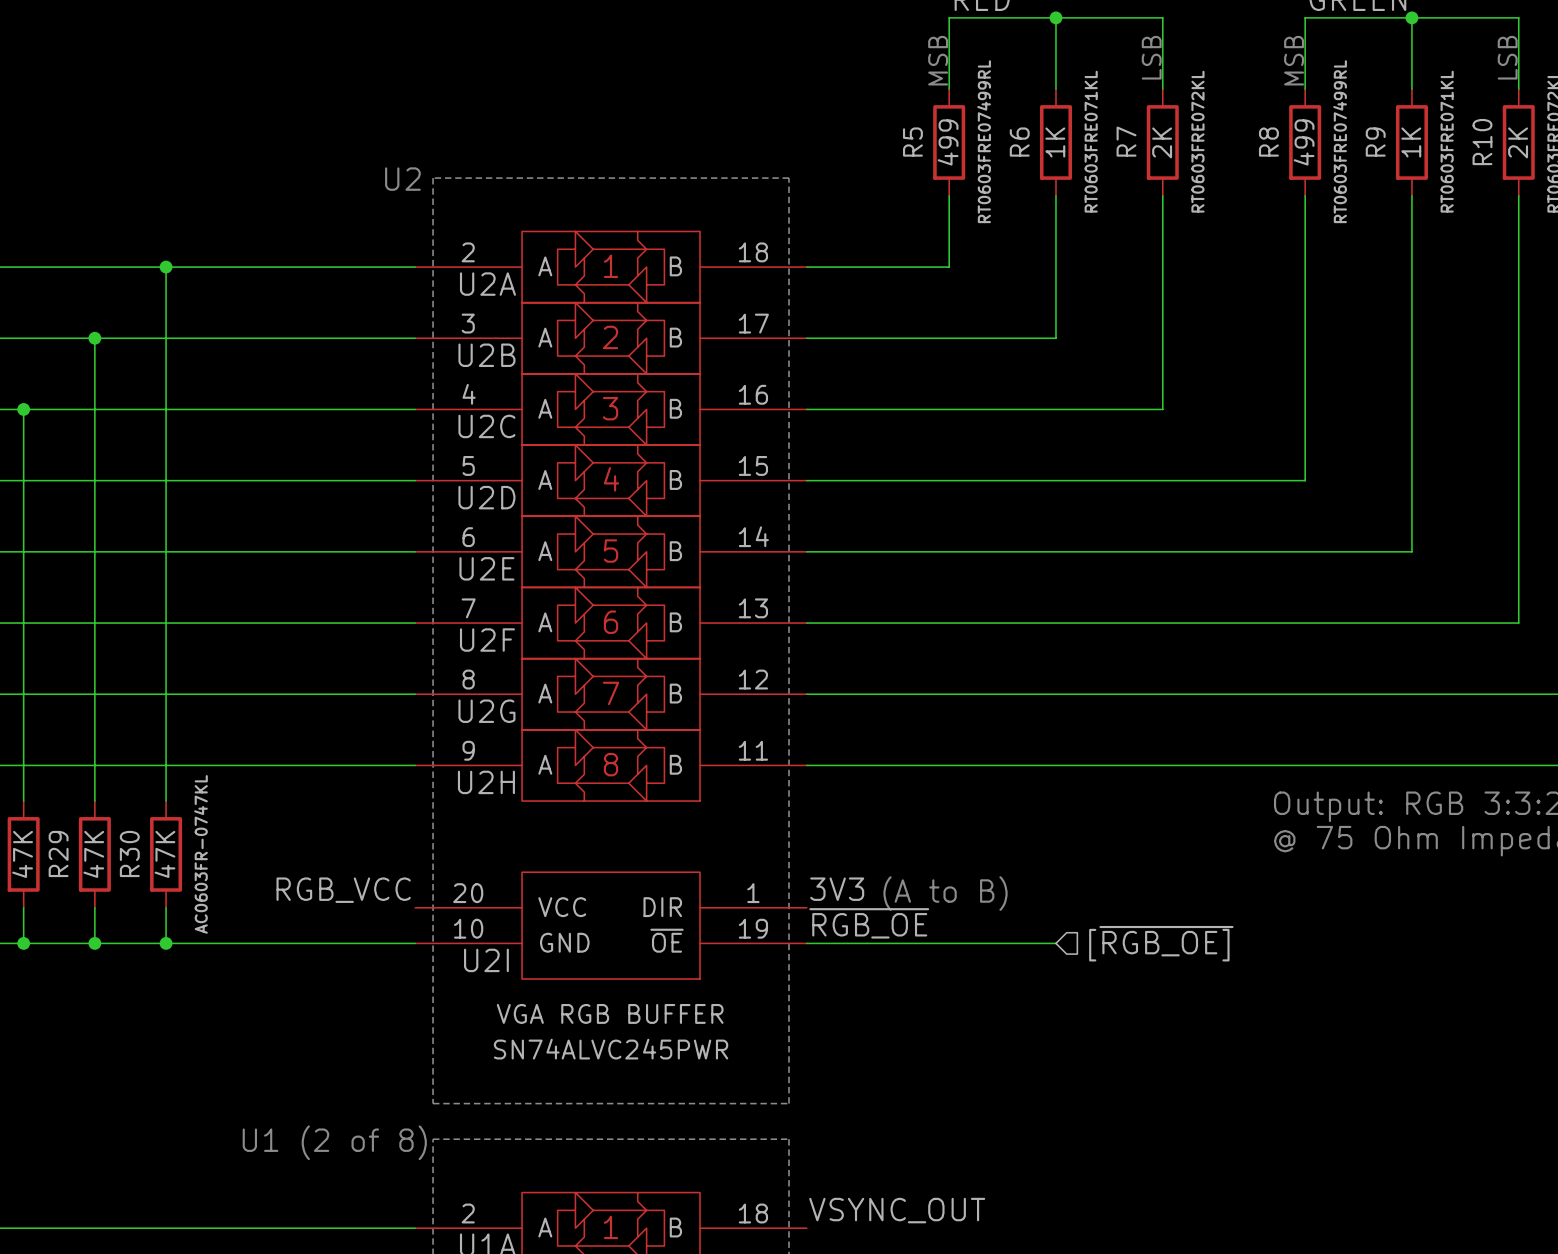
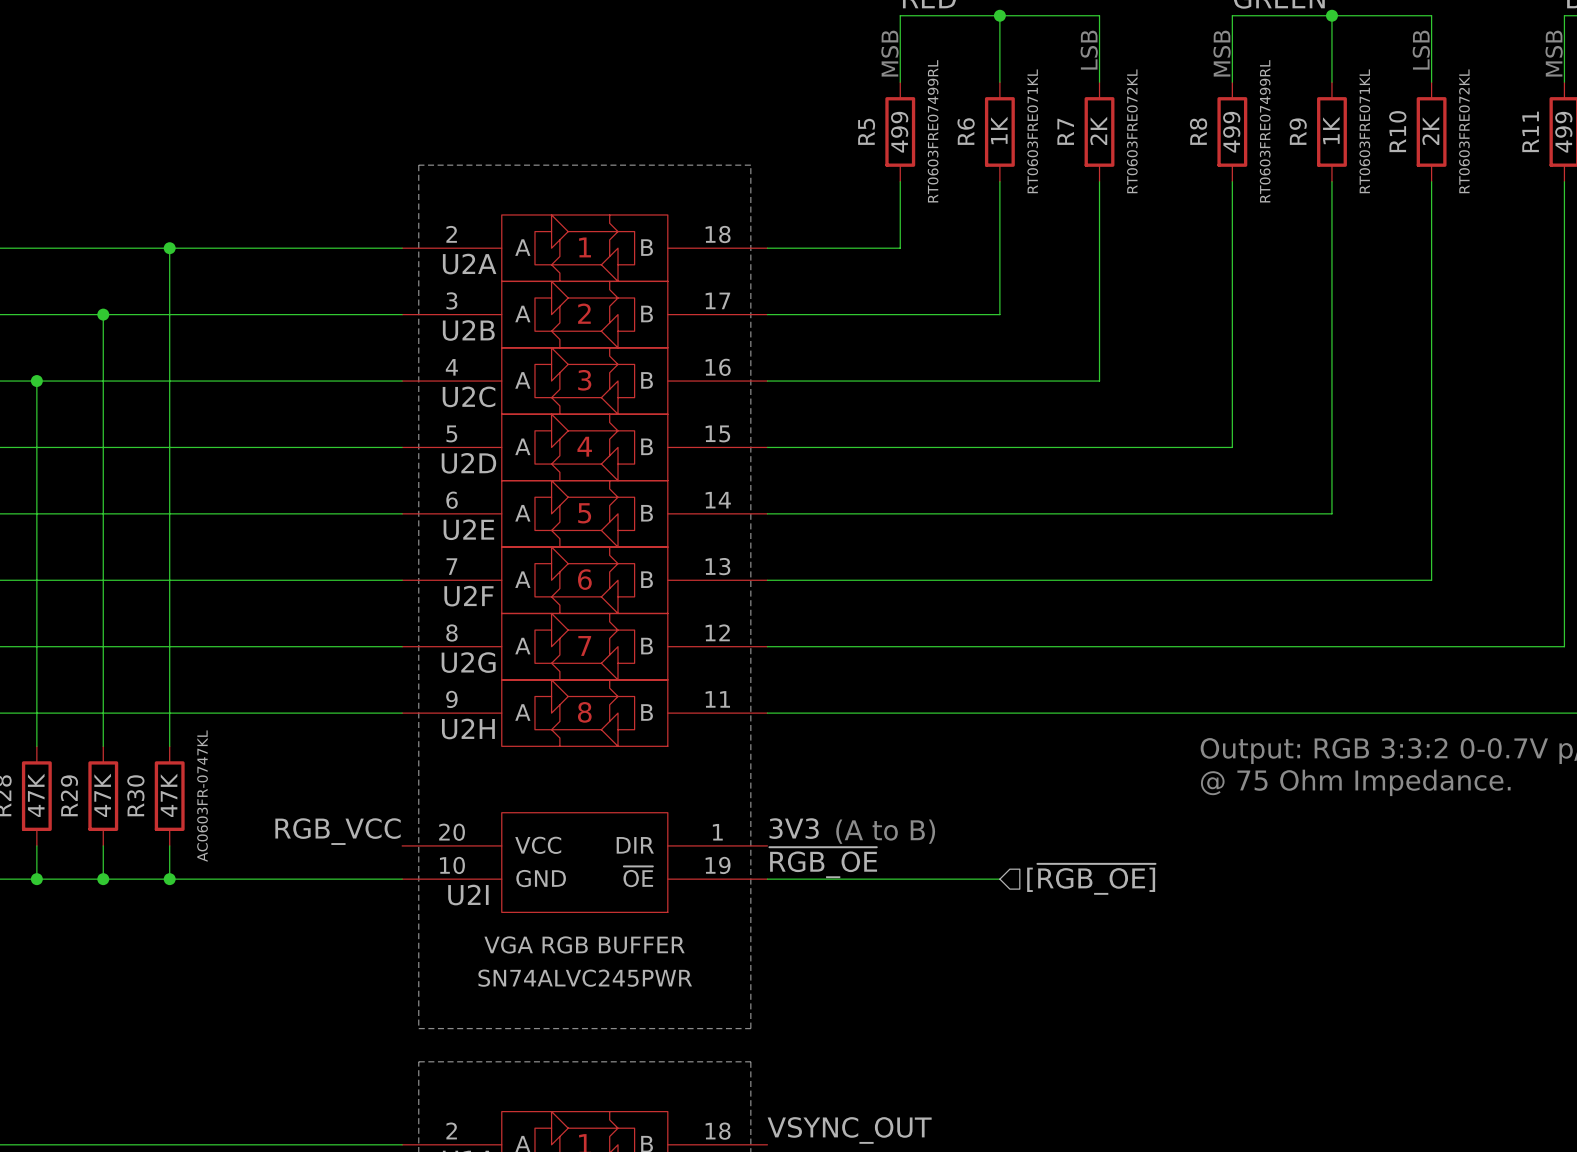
text: U2 (402, 179) -> none
text: U1 (2 of 8) (334, 1142) -> none

